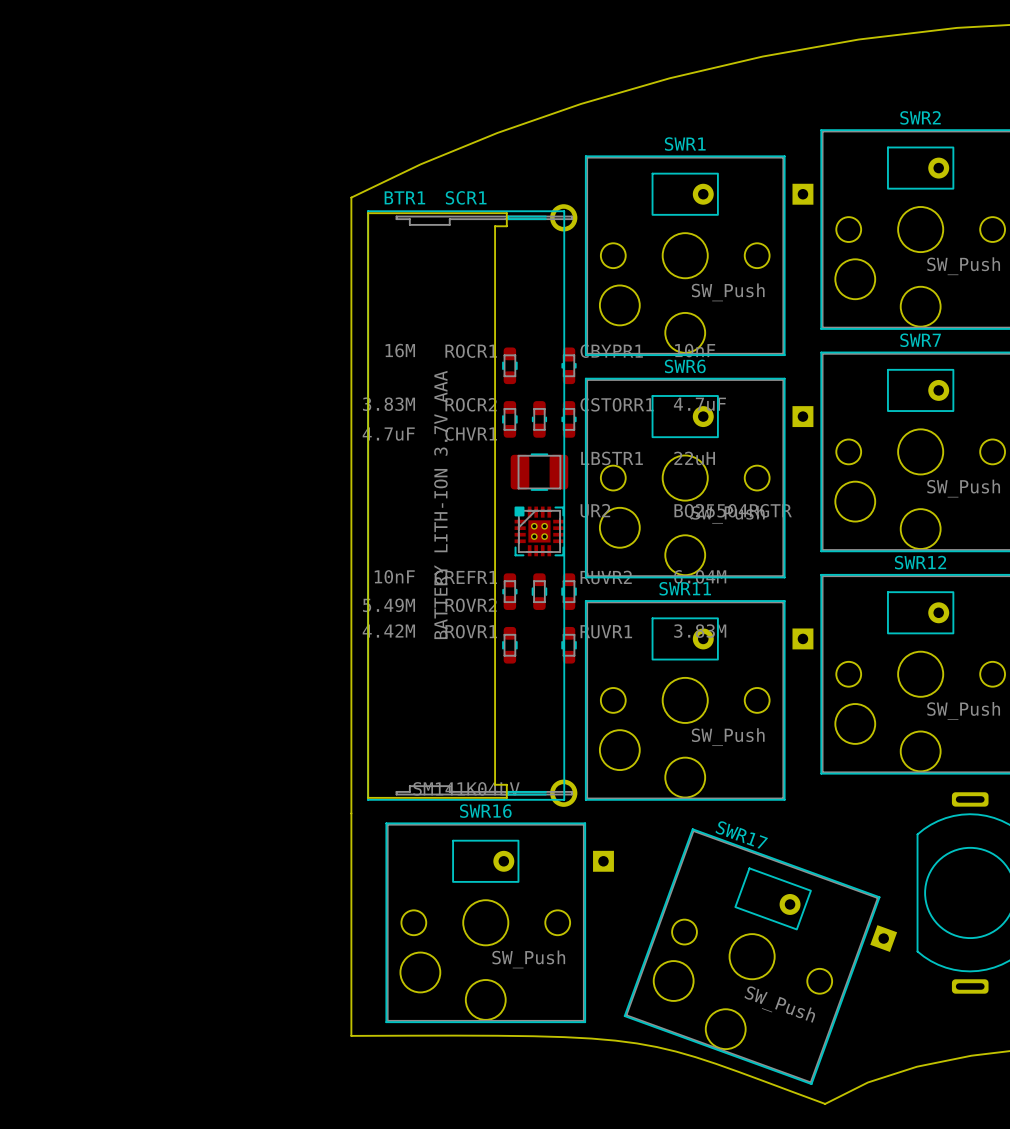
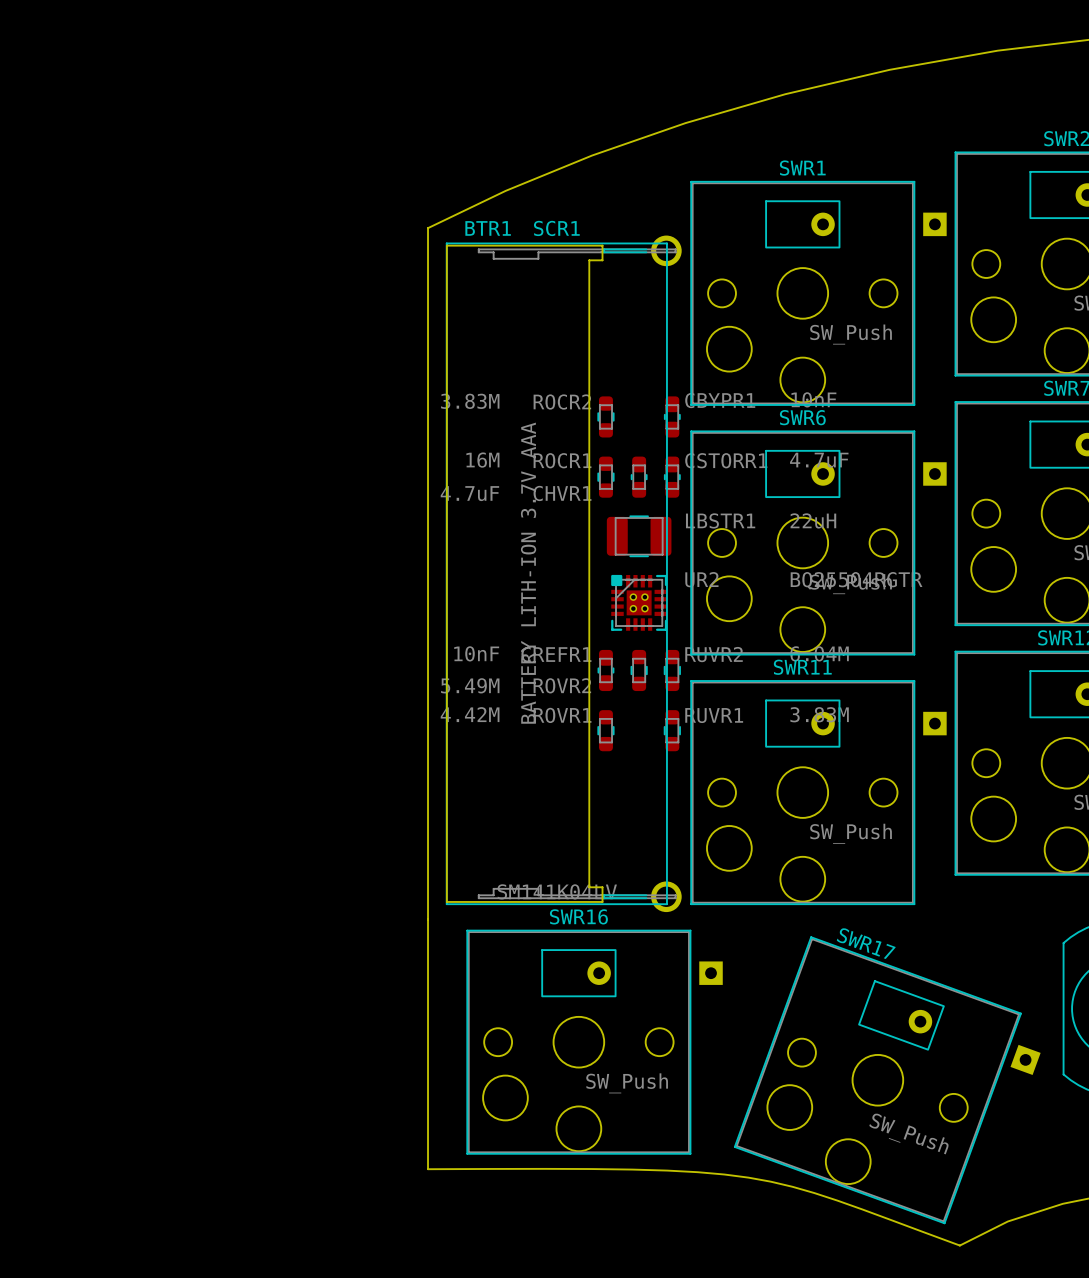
ROCR1 value: 16M (400, 350) -> 3.83M (470, 401)
ROCR1 name: ROCR1 (471, 351) -> ROCR2 (562, 402)
ROCR2 value: 3.83M (389, 404) -> 16M (482, 460)
ROCR2 name: ROCR2 (471, 404) -> ROCR1 (562, 460)

